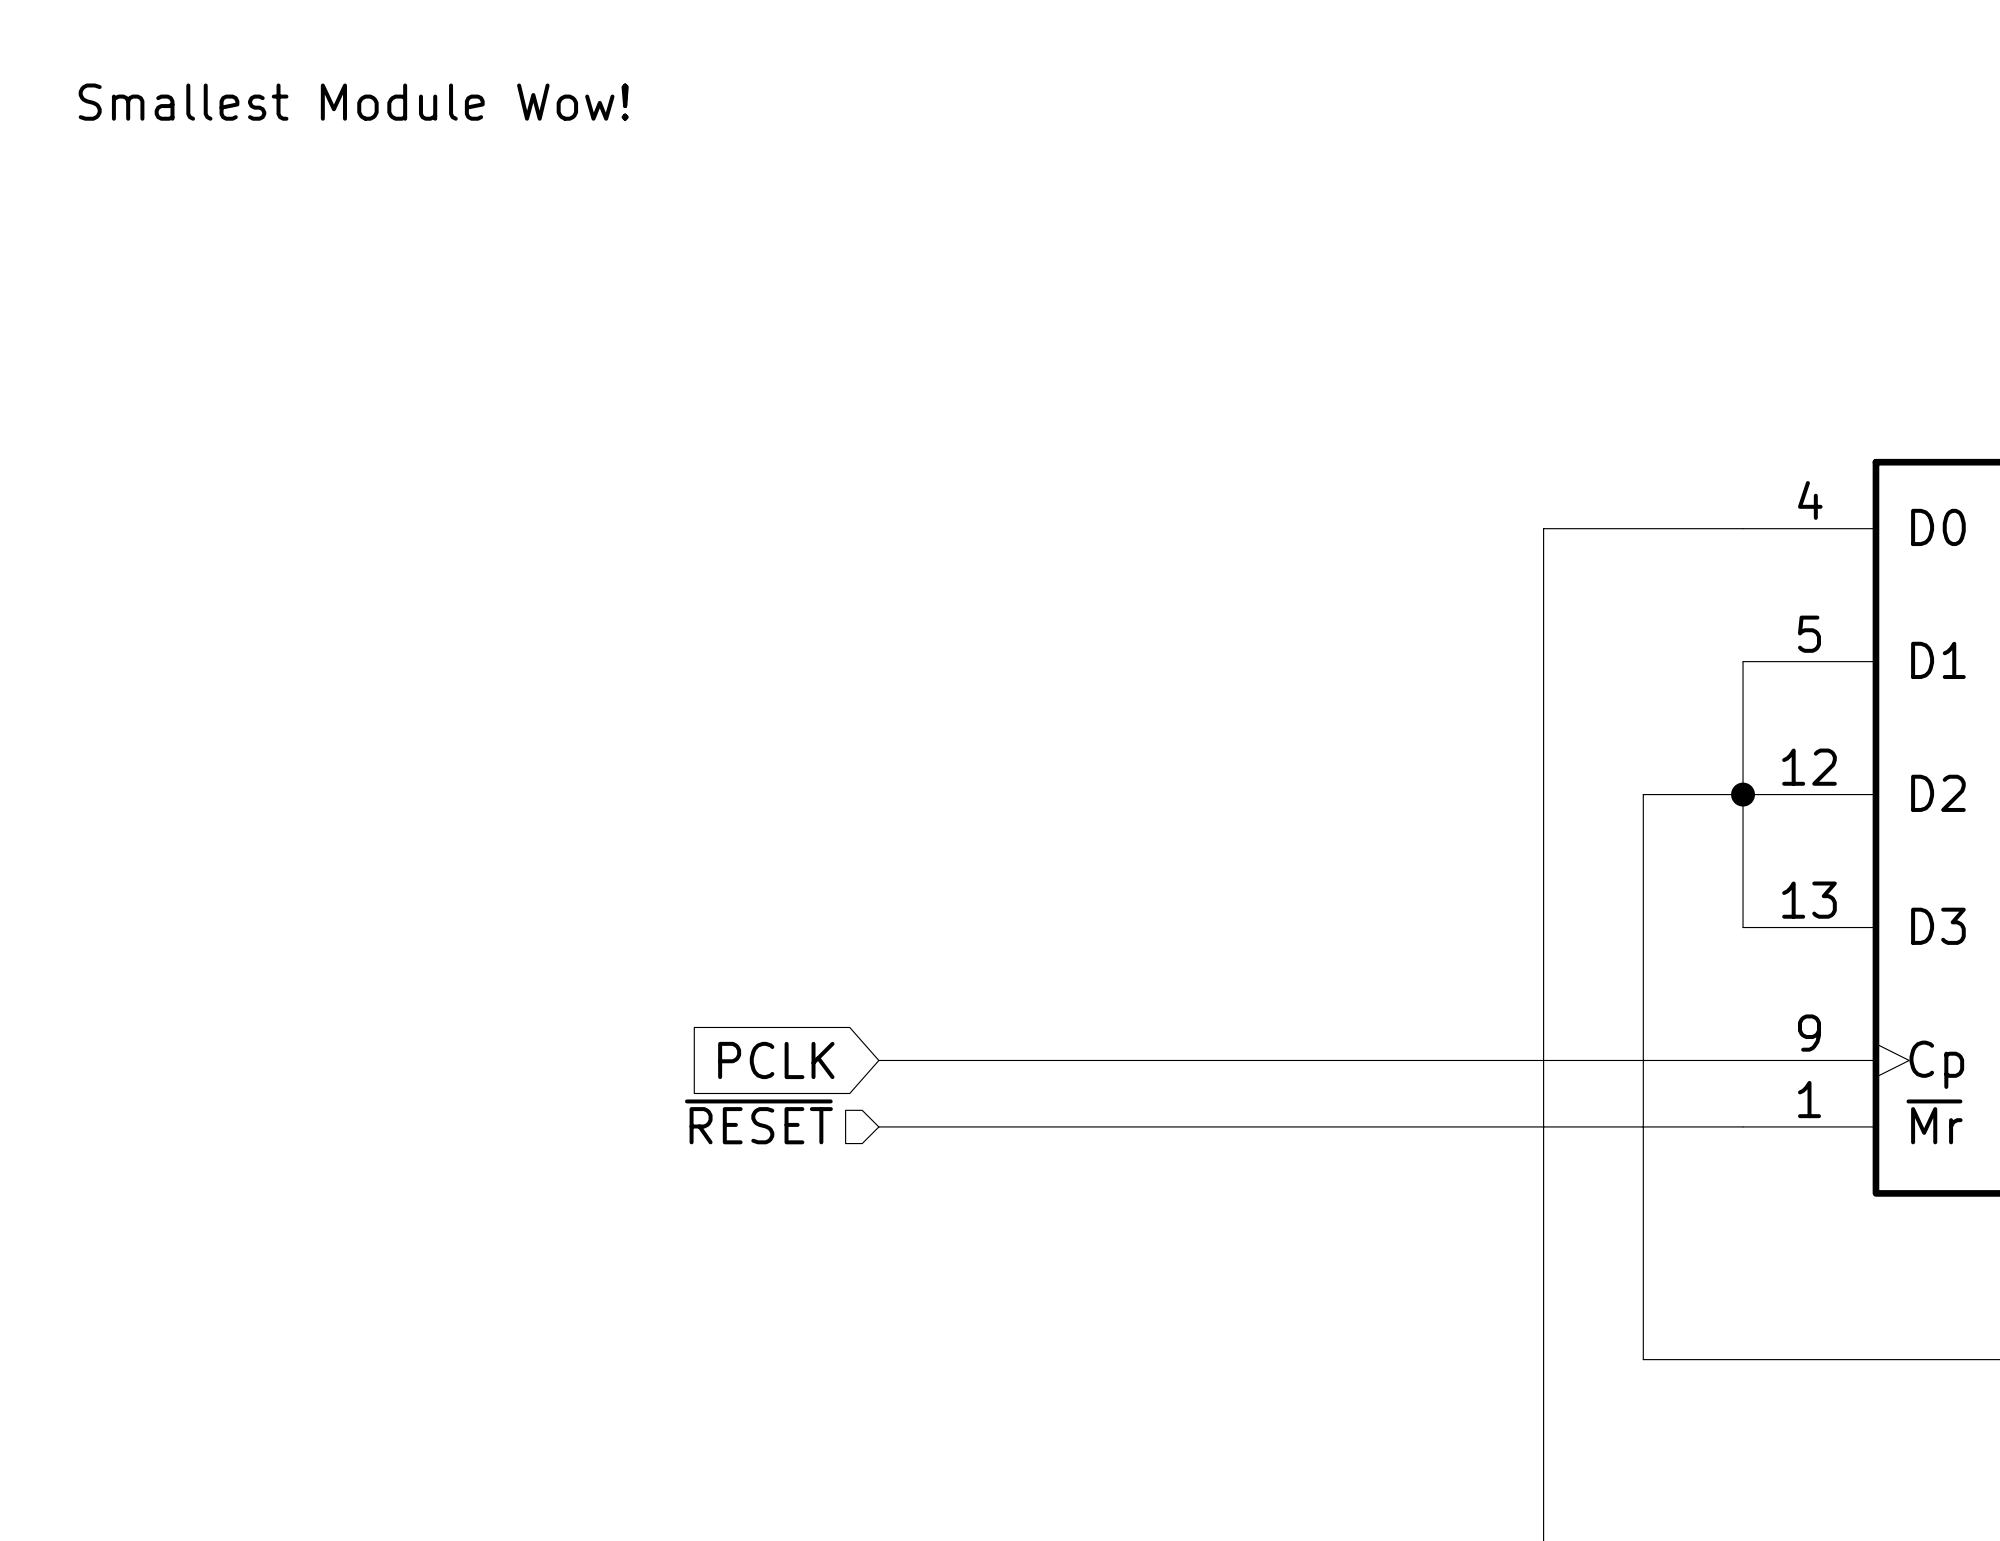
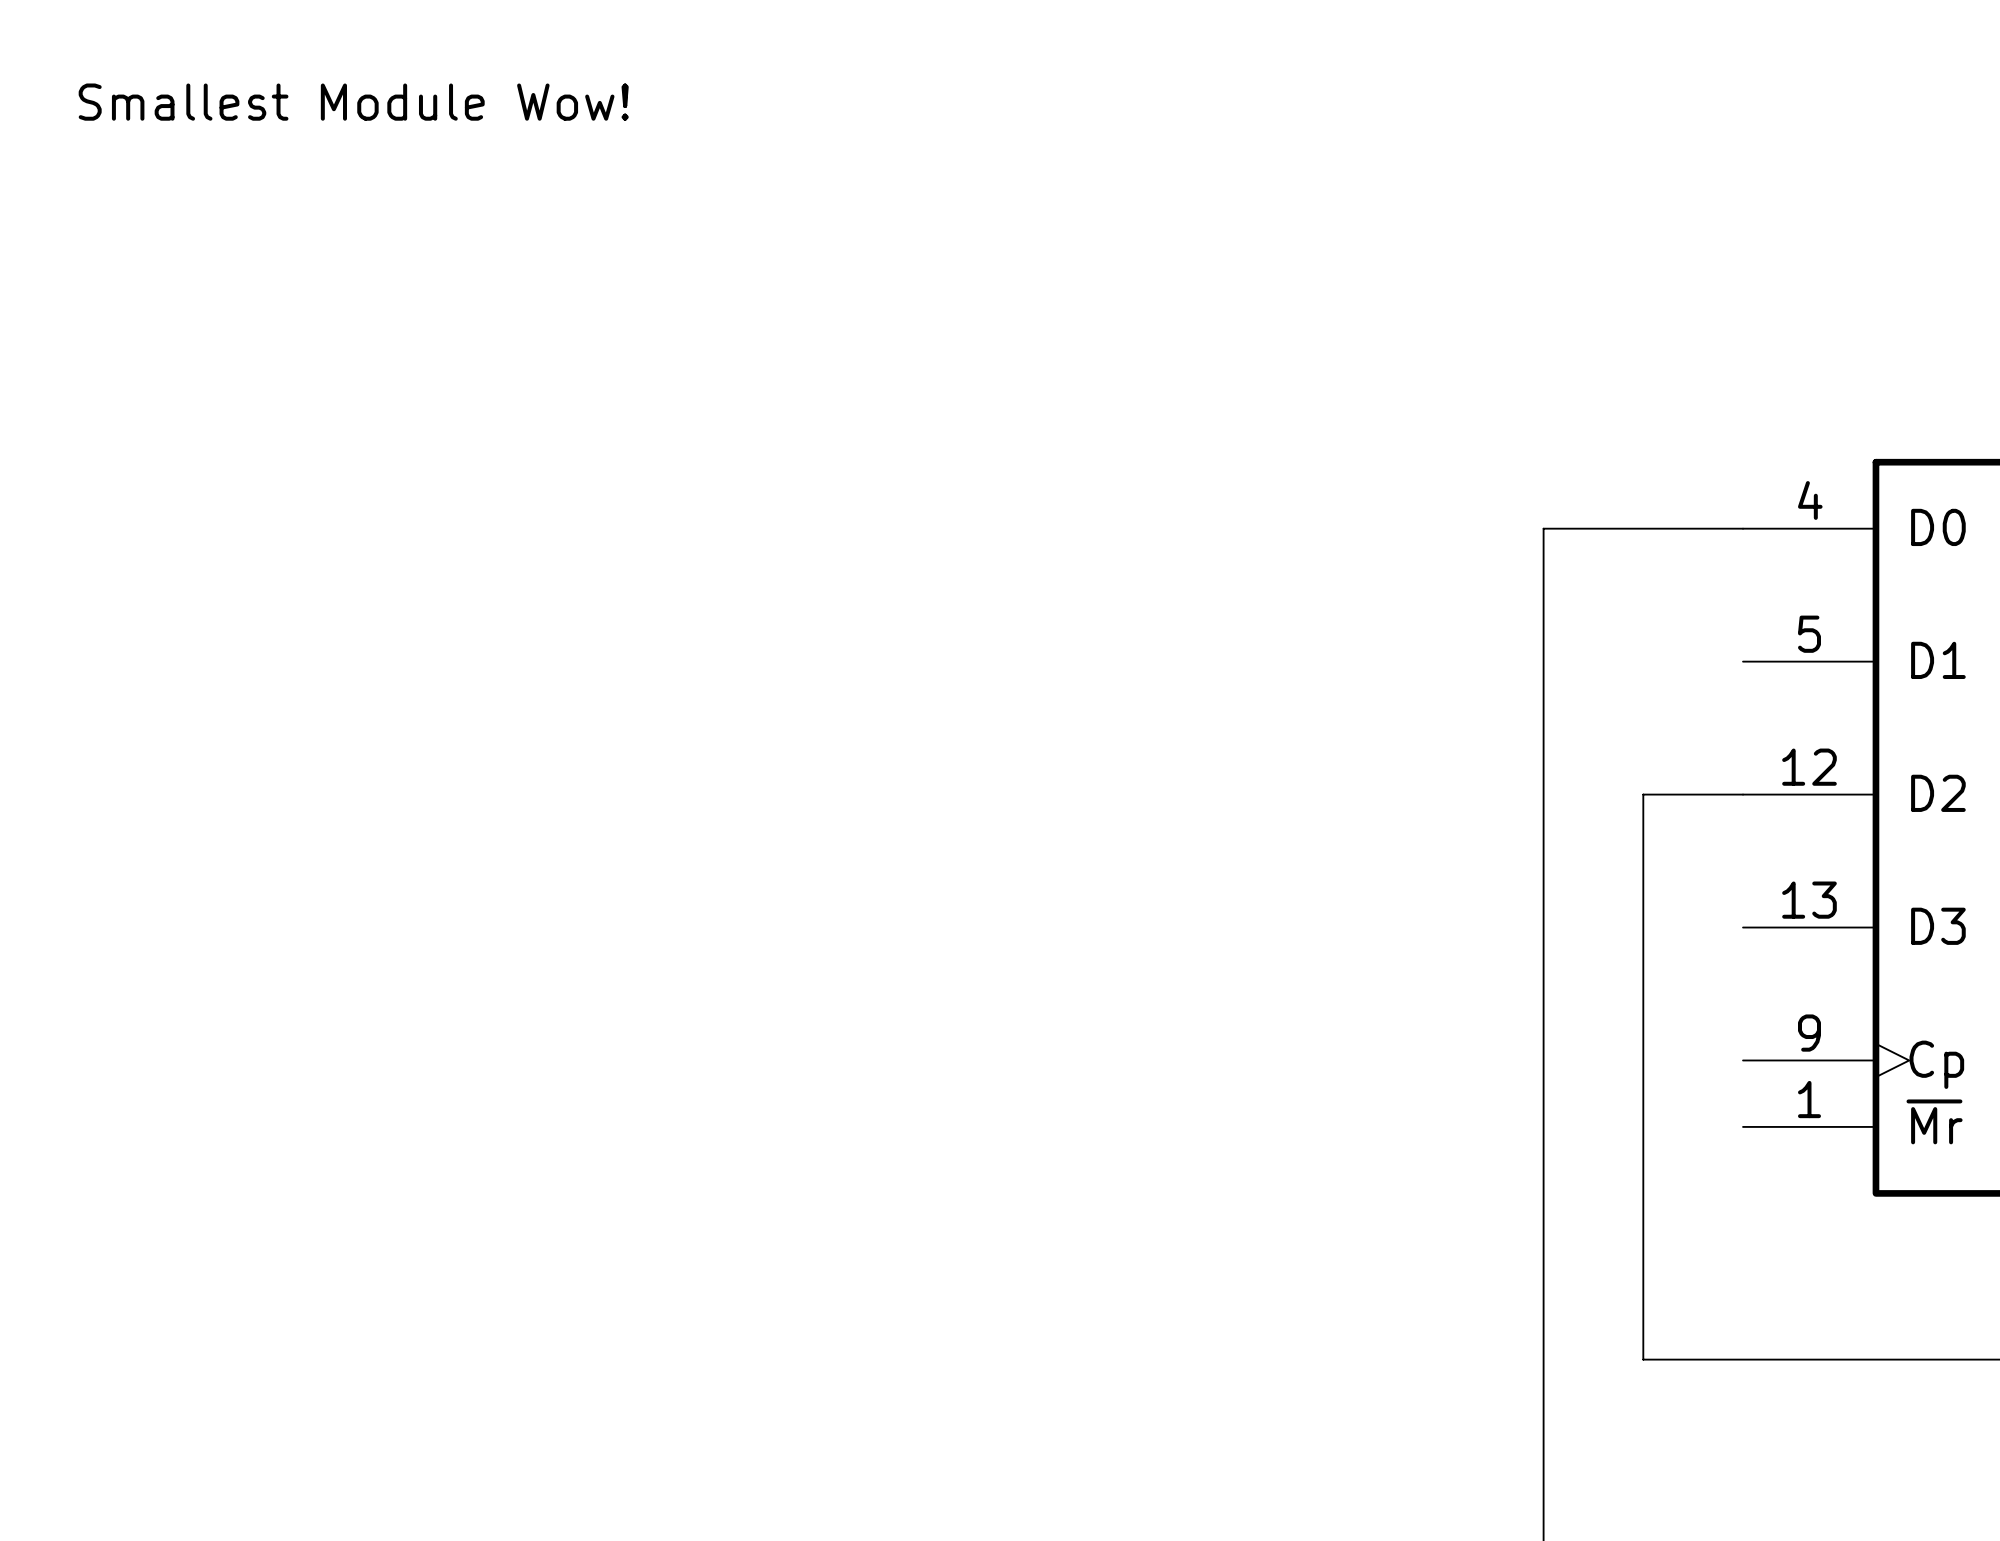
wire: (1743, 661) (1743, 927) -> none
junction: (1743, 794) -> none
global label: PCLK (776, 1060) -> none
wire: (878, 1060) (1743, 1060) -> none
hierarchical label: ~{RESET} (758, 1121) -> none
wire: (878, 1126) (1743, 1126) -> none

